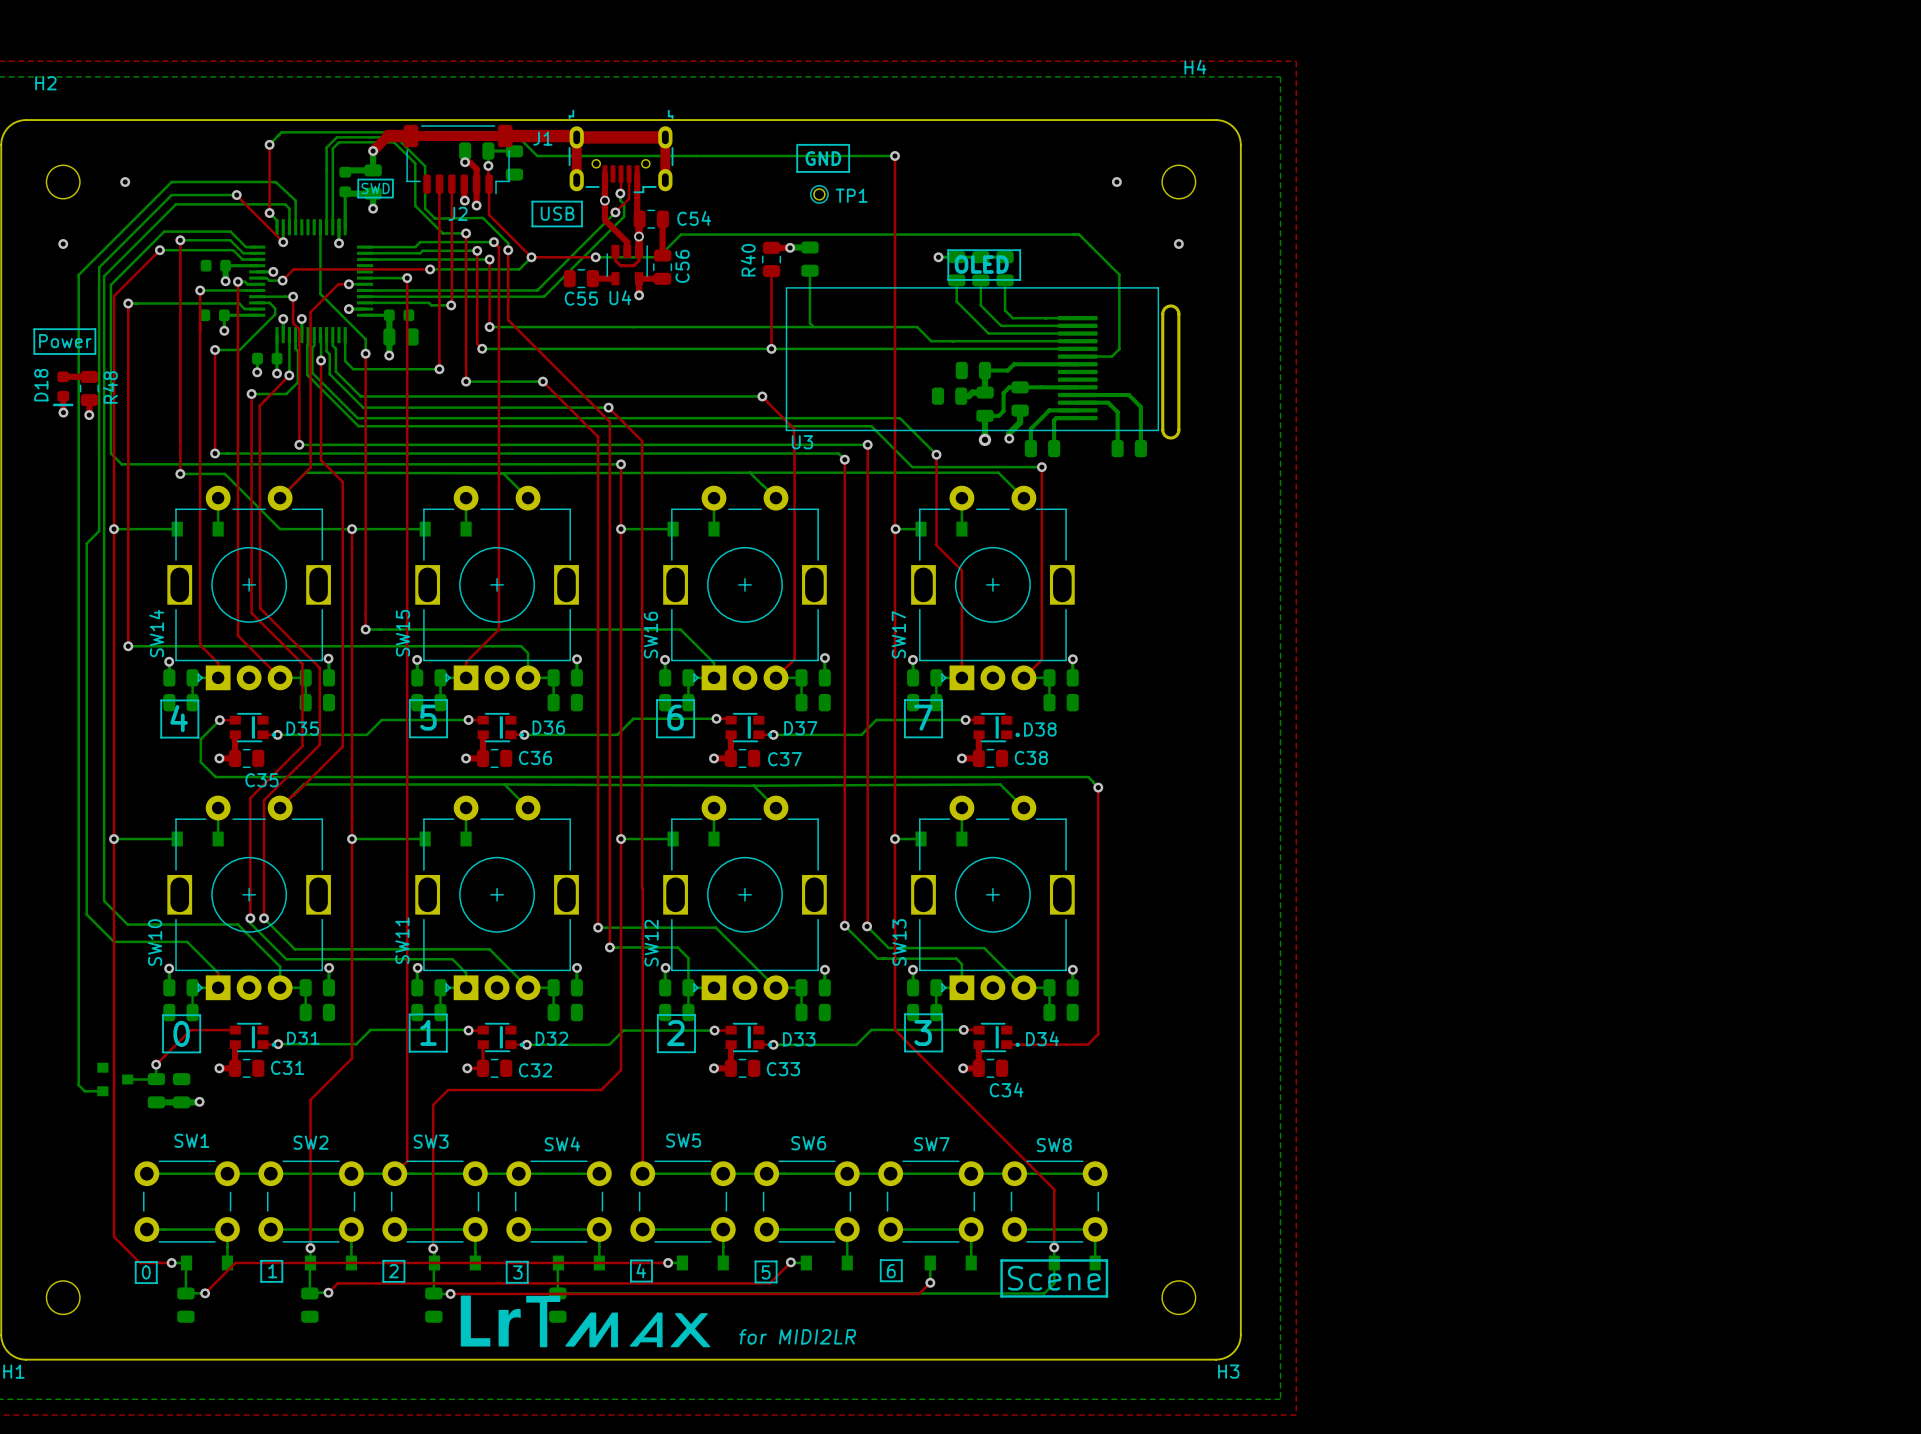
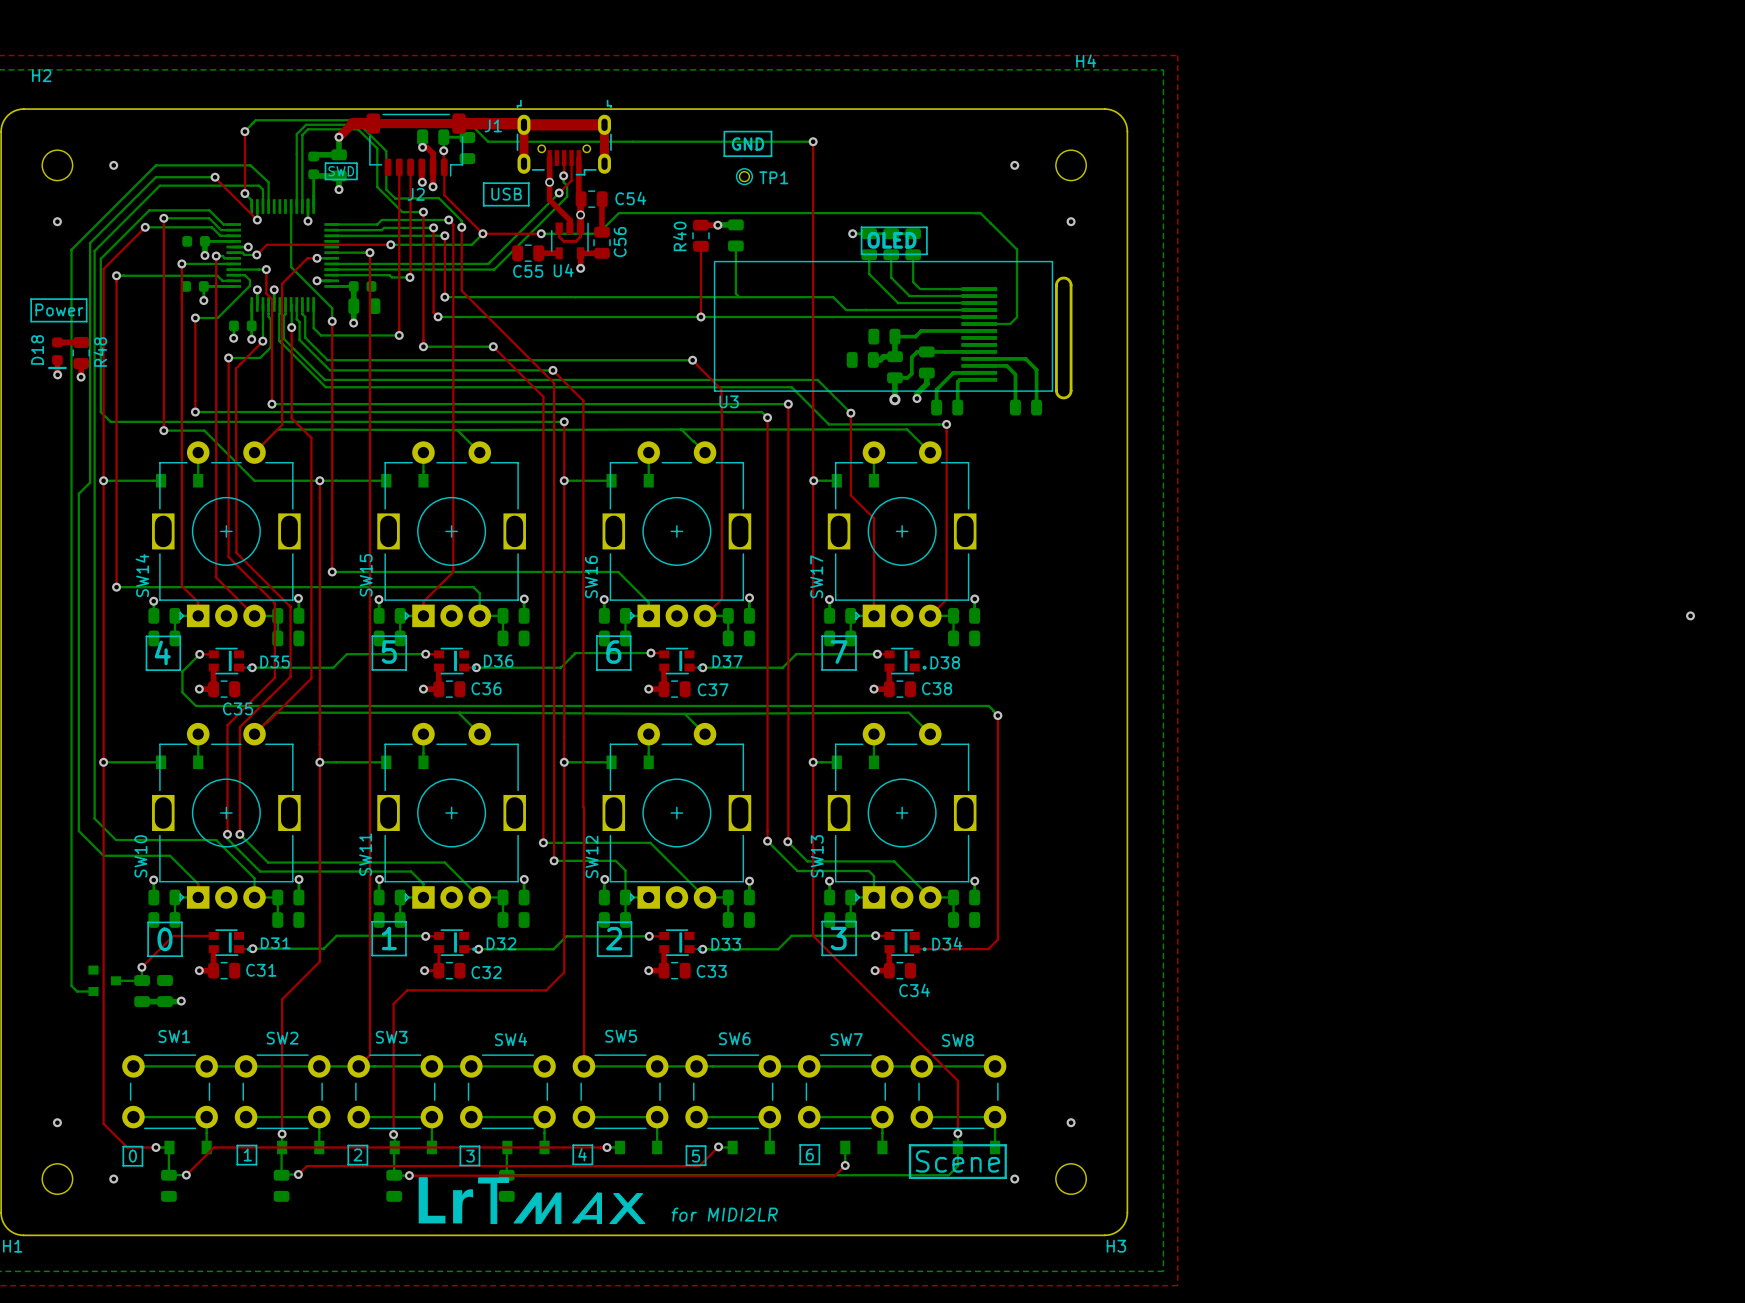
via: none -> (1690, 615)
via: none -> (57, 1122)
via: none -> (1071, 1122)
via: none -> (113, 1179)
via: none -> (1014, 1179)

